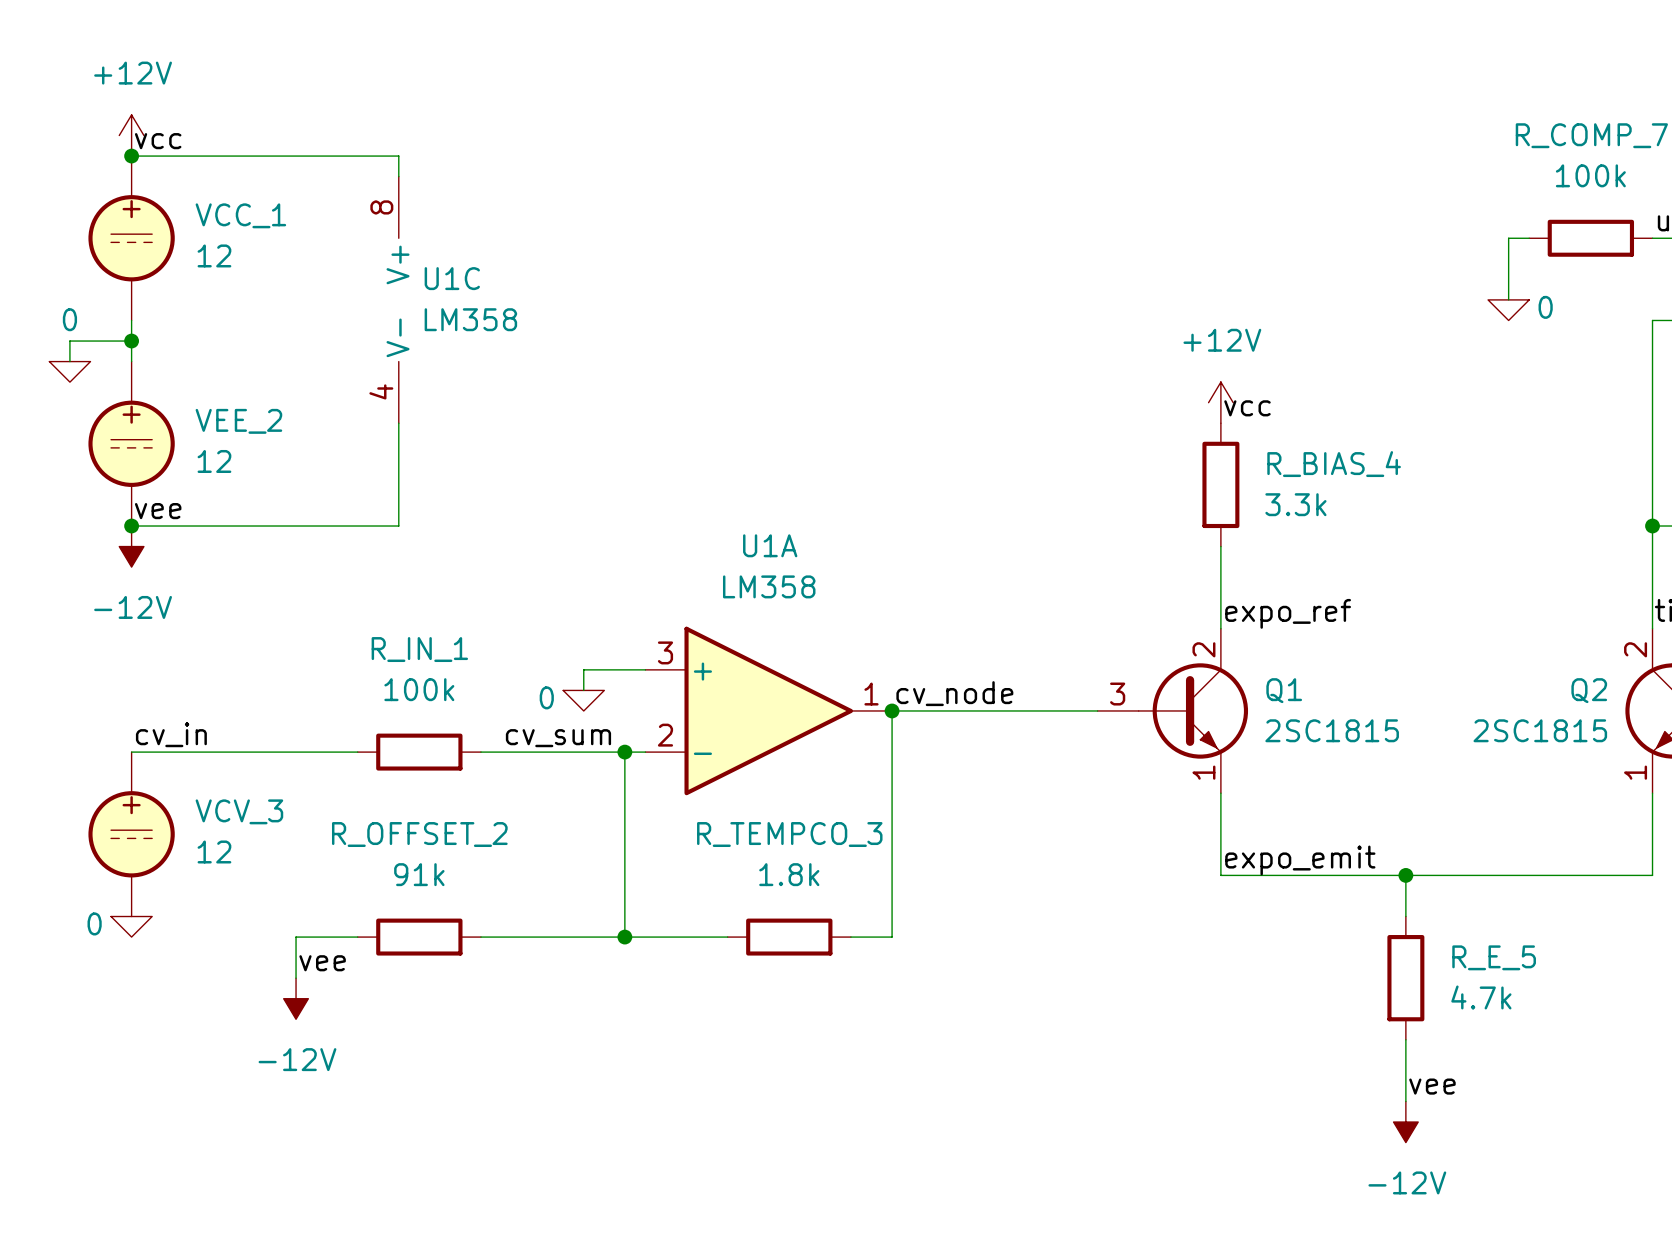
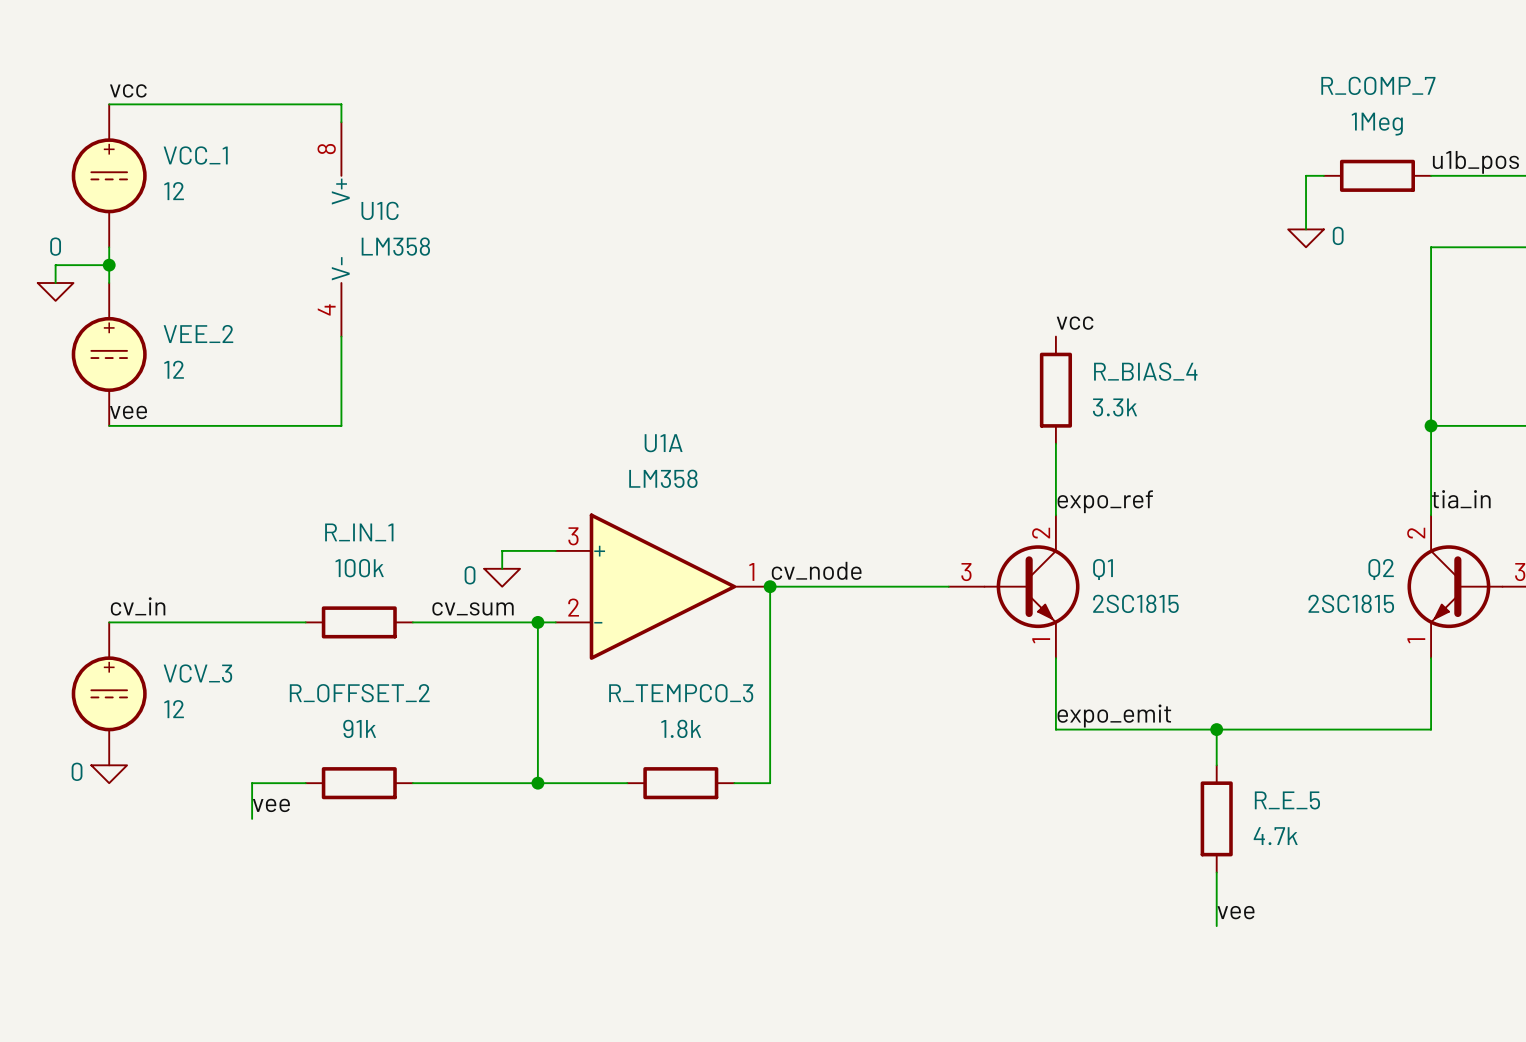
power symbol: +12V (131, 135) -> none
junction: (131, 156) -> none
R_COMP_7 value: 100k (1590, 175) -> 1Meg (1377, 124)
power symbol: +12V (1220, 402) -> none
junction: (131, 526) -> none
power symbol: -12V (131, 546) -> none
power symbol: -12V (296, 998) -> none
power symbol: -12V (1405, 1122) -> none

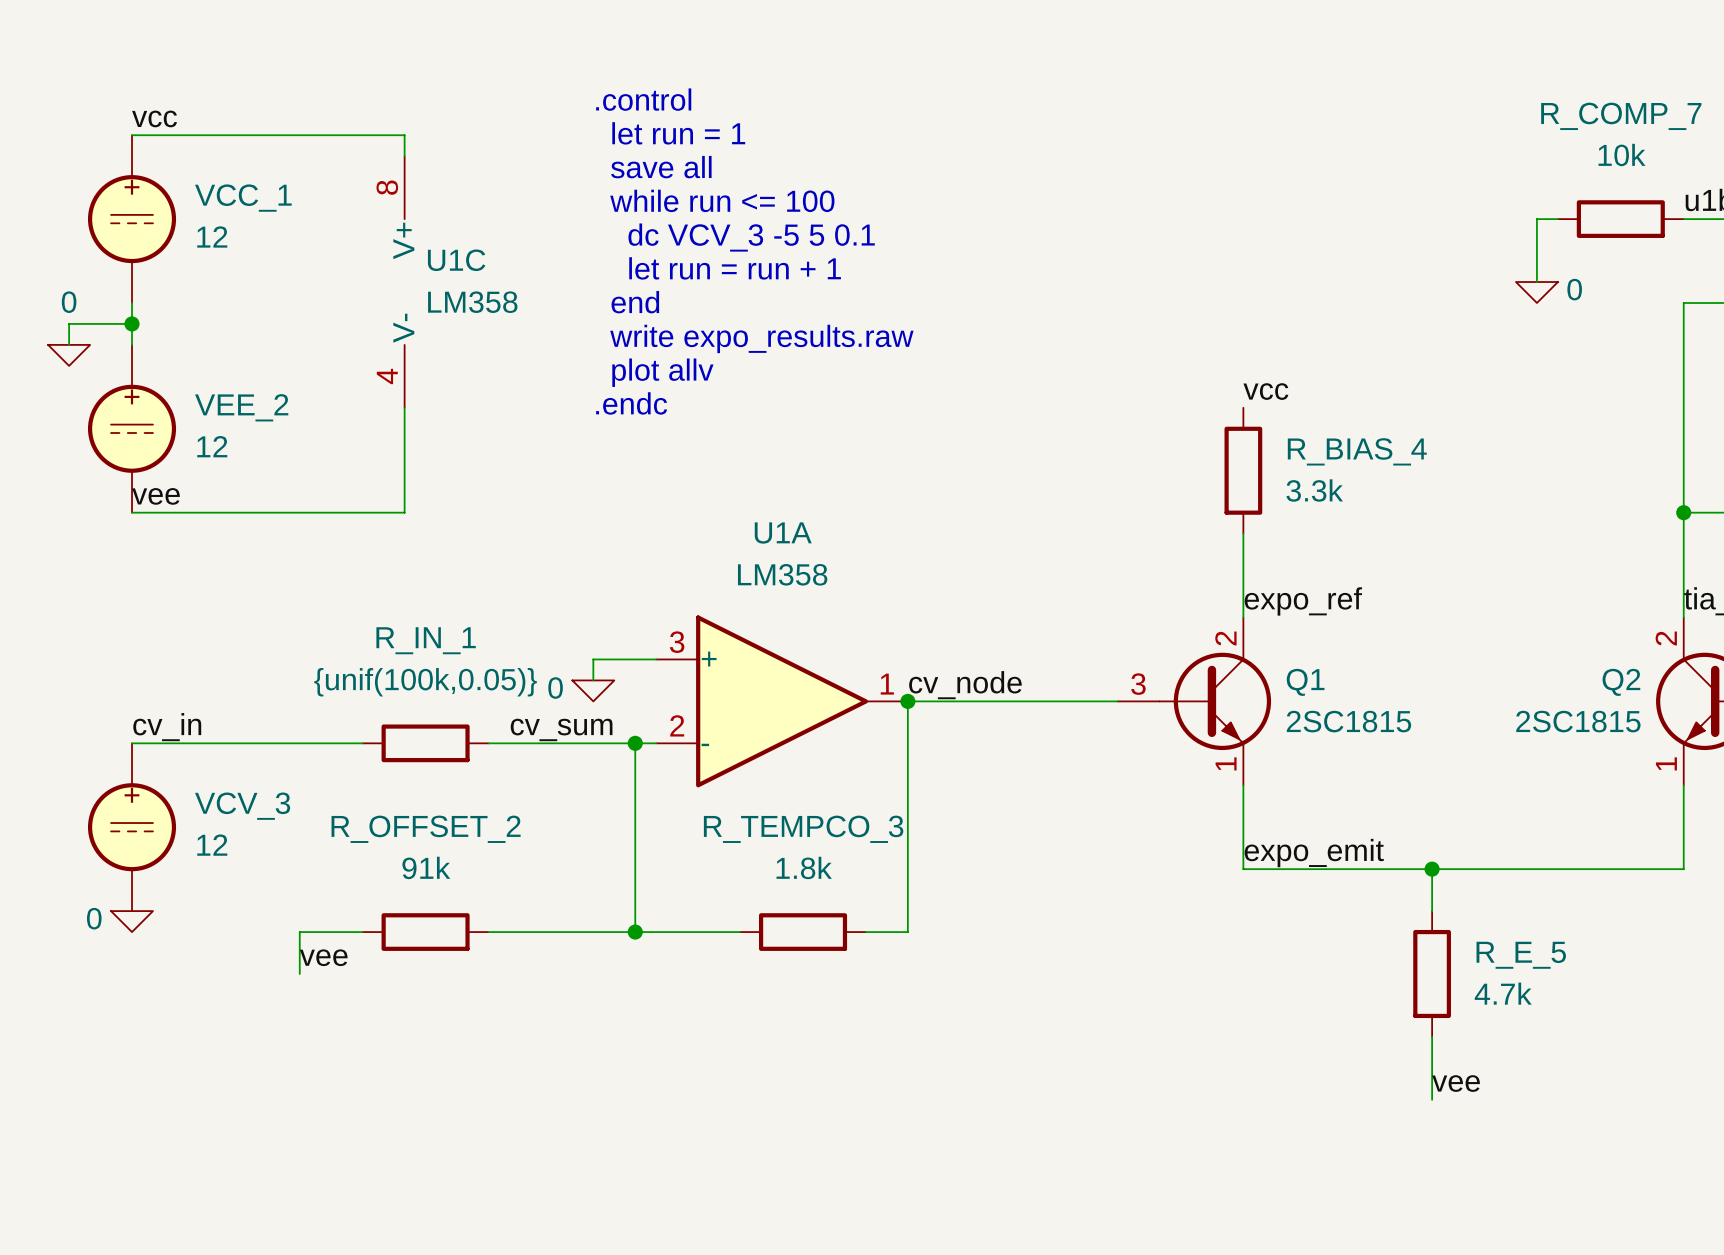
text: none -> .control (643, 99)
text: none -> let run = 1 (678, 133)
R_COMP_7 value: 1Meg (1377, 124) -> 10k (1622, 155)
text: none -> save all (661, 167)
text: none -> while run <= 100 (722, 200)
text: none -> dc VCV_3 -5 5 0.1 (751, 237)
text: none -> let run = run + 1 (735, 268)
text: none -> end (635, 302)
text: none -> write expo_results.raw (761, 338)
text: none -> plot allv (662, 372)
text: none -> .endc (631, 403)
R_IN_1 value: 100k (359, 568) -> {unif(100k,0.05)} (425, 682)

